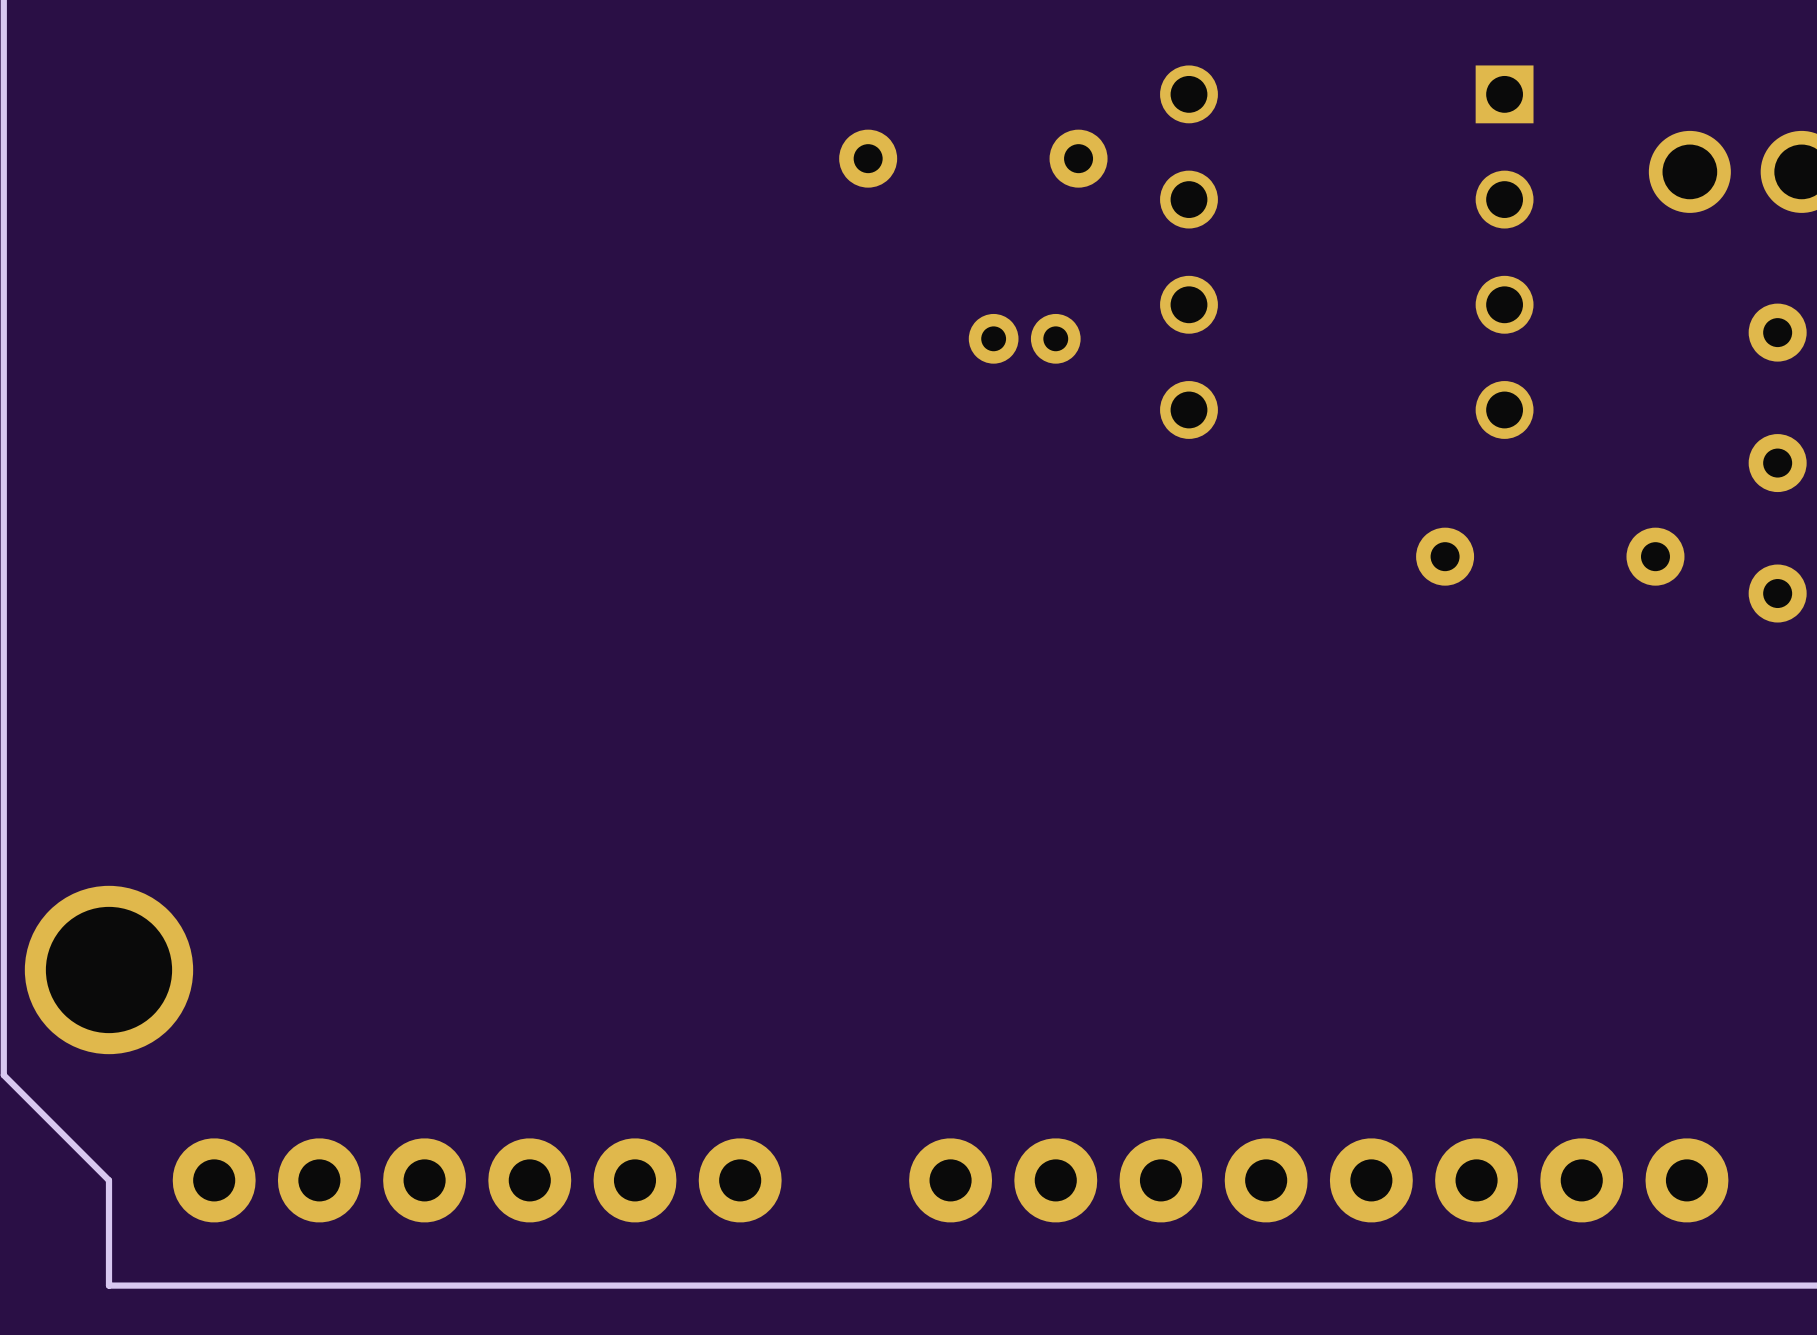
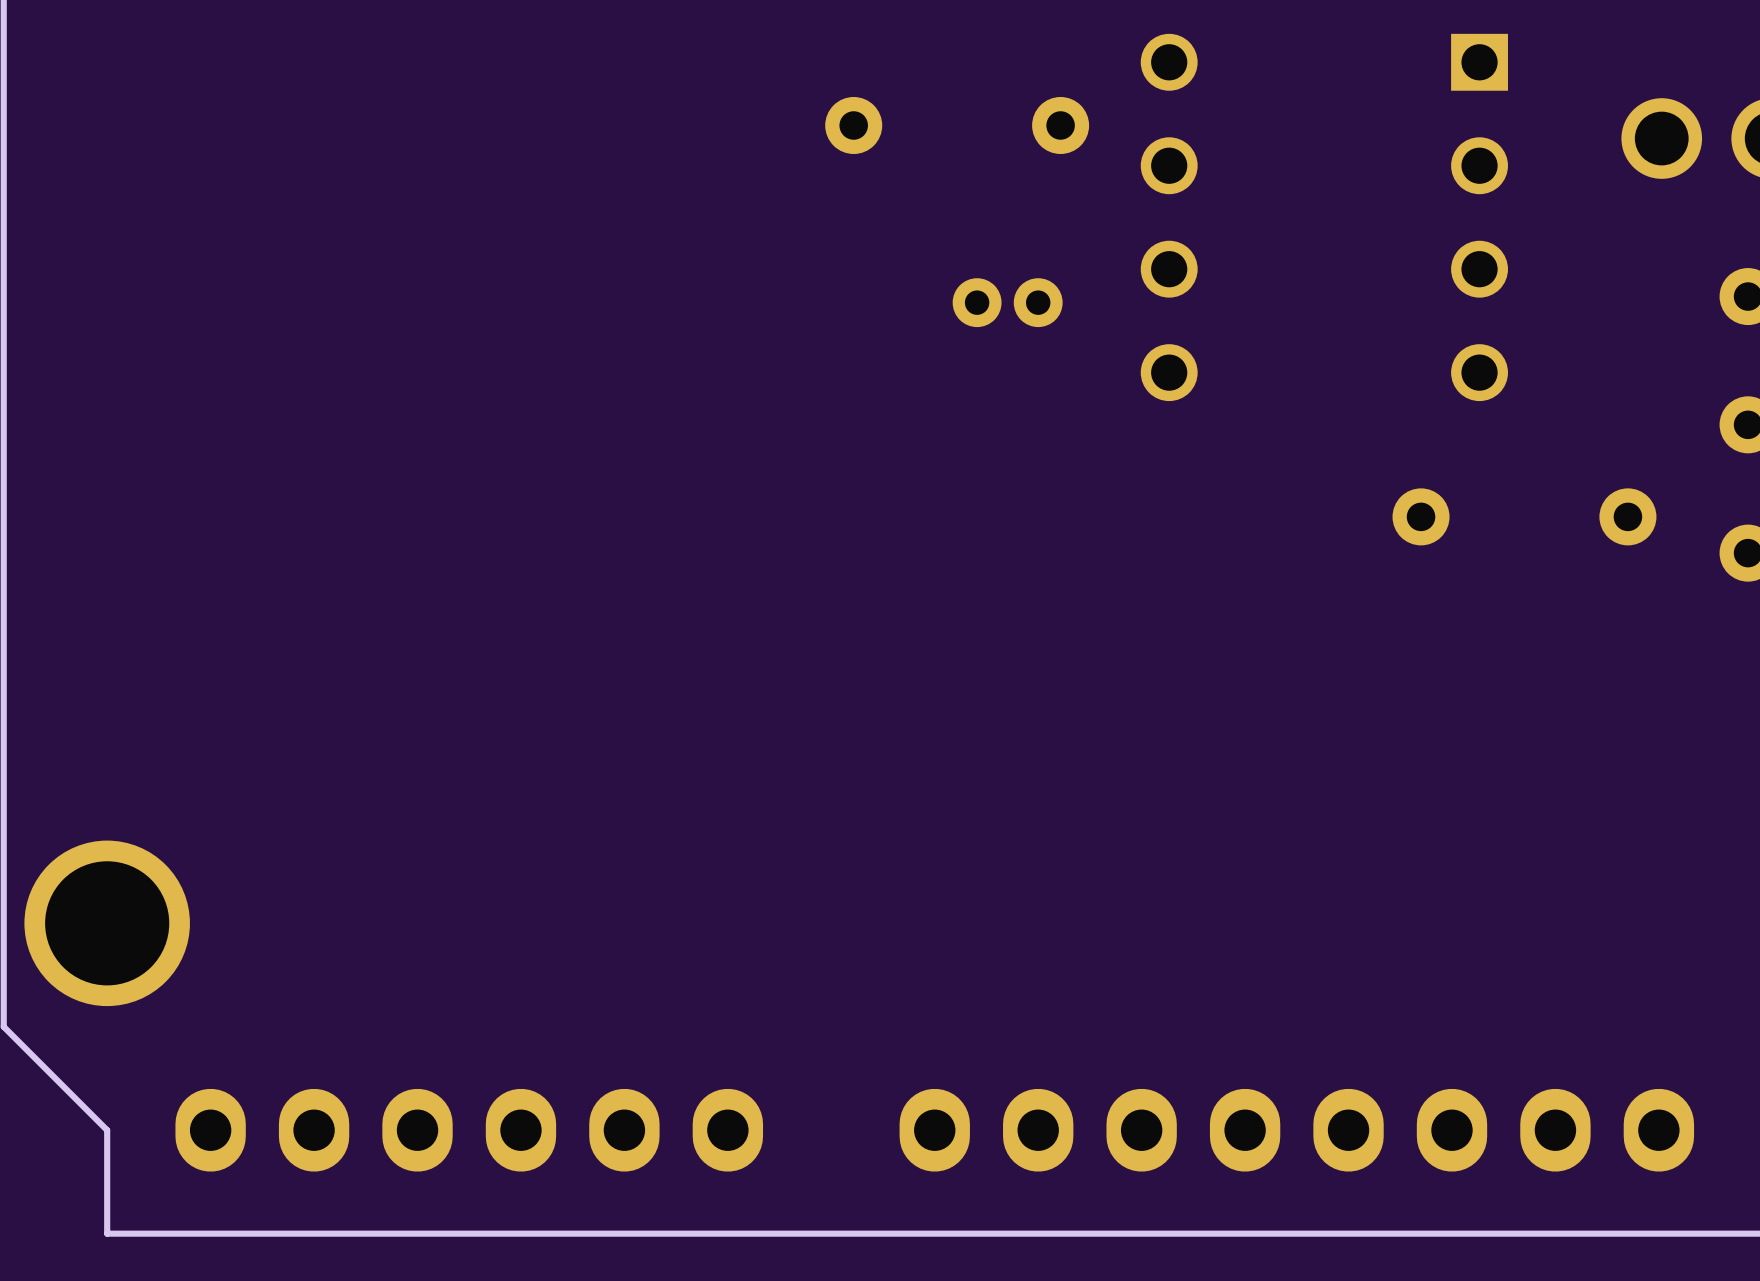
part footprint: [172, 1138, 782, 1223] -> [175, 1088, 764, 1172]
part footprint: [909, 1138, 1729, 1223] -> [899, 1088, 1695, 1172]

